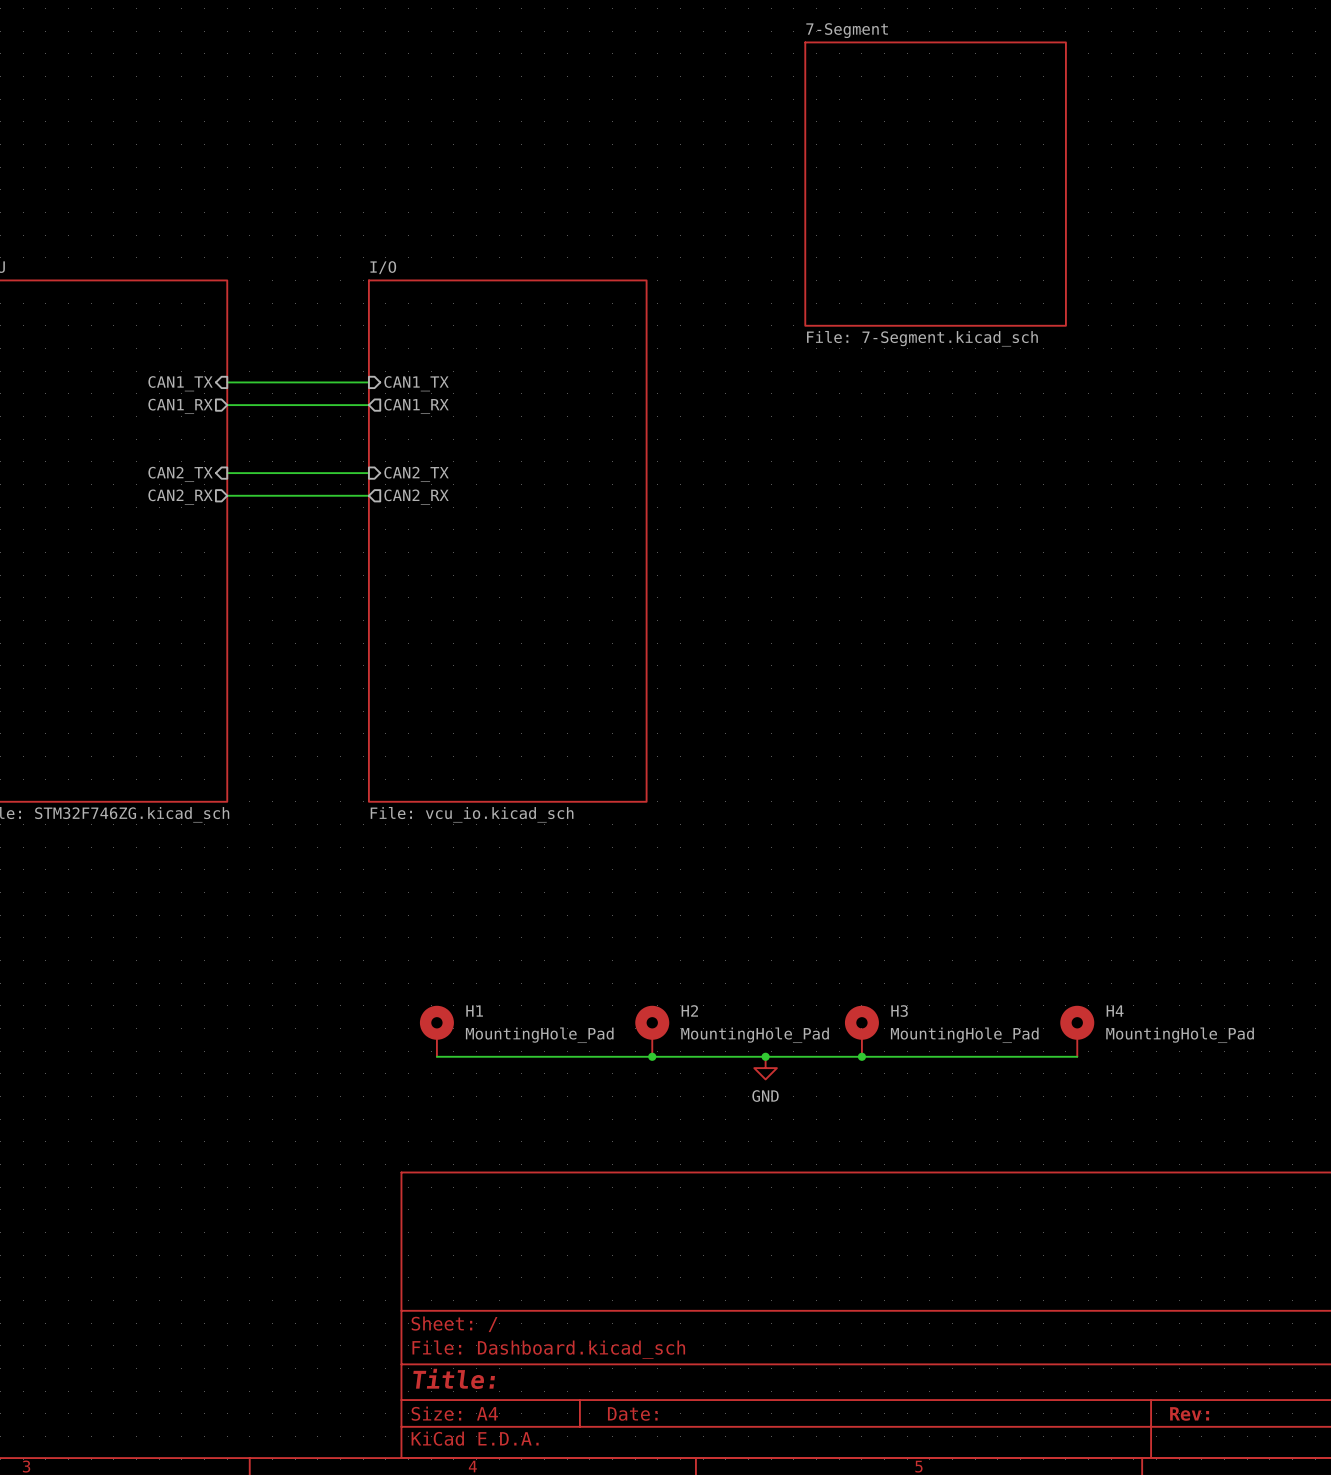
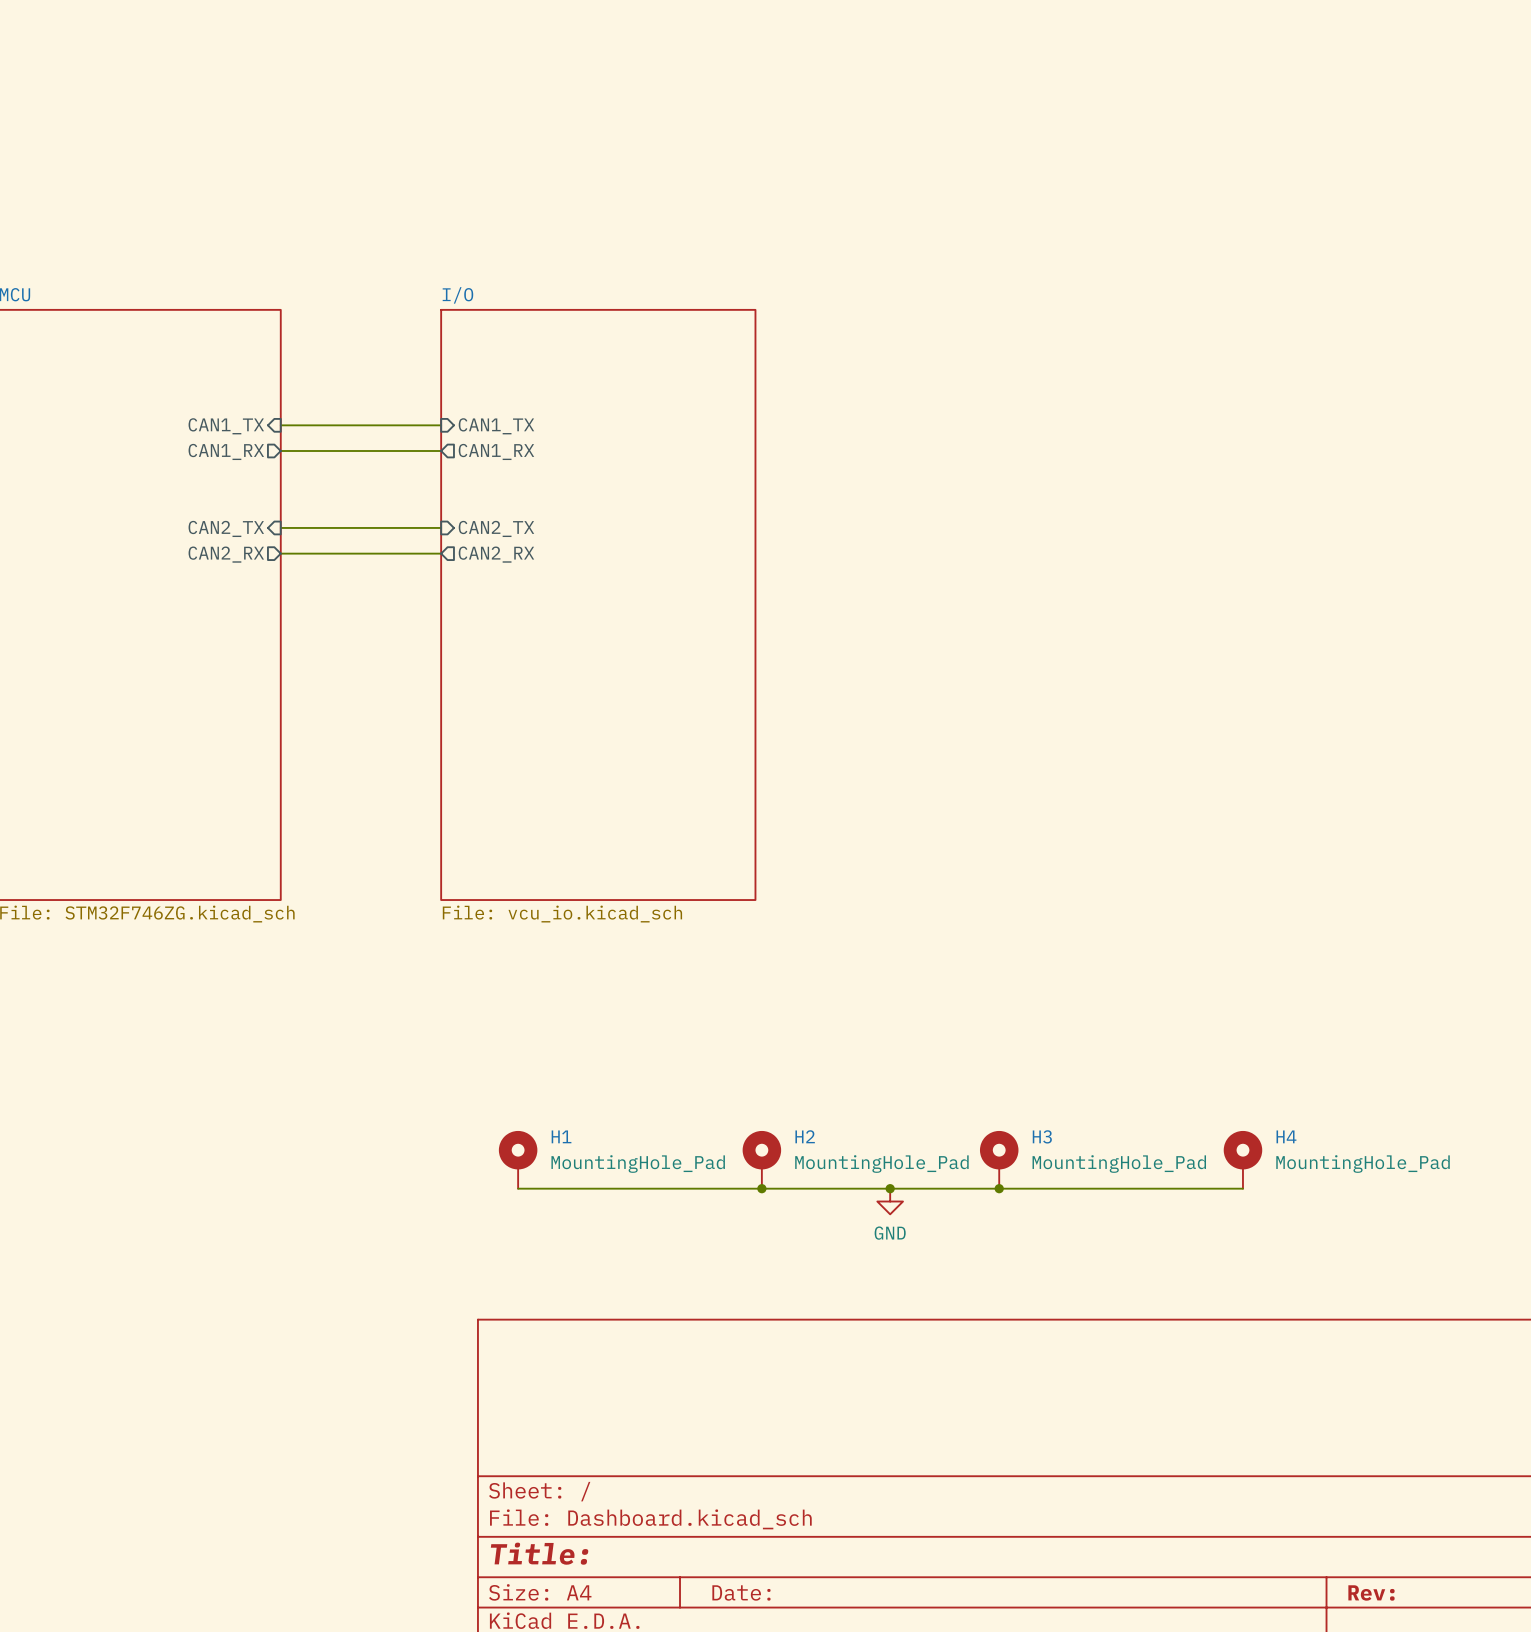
sheet 7-Segment: File: 7-Segment.kicad_sch (935, 184) -> none

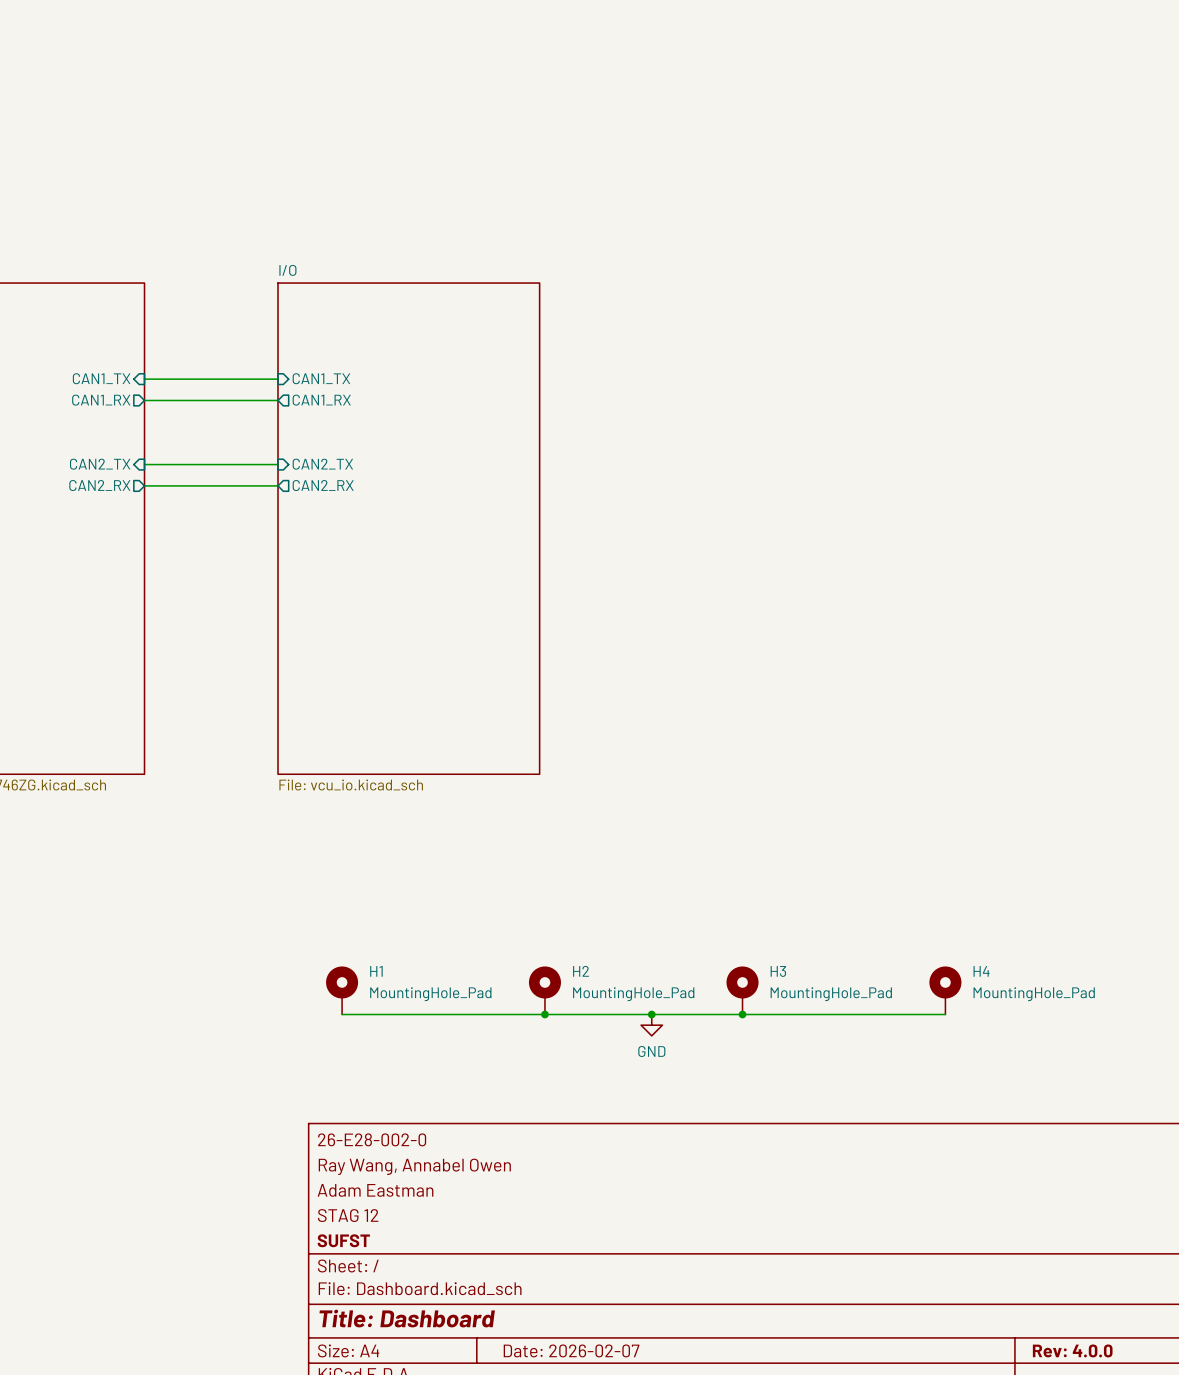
title block: none -> 26-E28-002-0 (372, 1139)
title block: none -> Ray Wang, Annabel Owen (414, 1166)
title block: none -> Adam Eastman (375, 1190)
title block: none -> STAG 12 (348, 1215)
title block: none -> SUFST (343, 1240)
title block: Title: (539, 1553) -> Title: Dashboard (407, 1318)
title block: Date: (741, 1592) -> Date: 2026-02-07 (571, 1350)
title block: Rev: (1371, 1592) -> Rev: 4.0.0 (1072, 1350)

